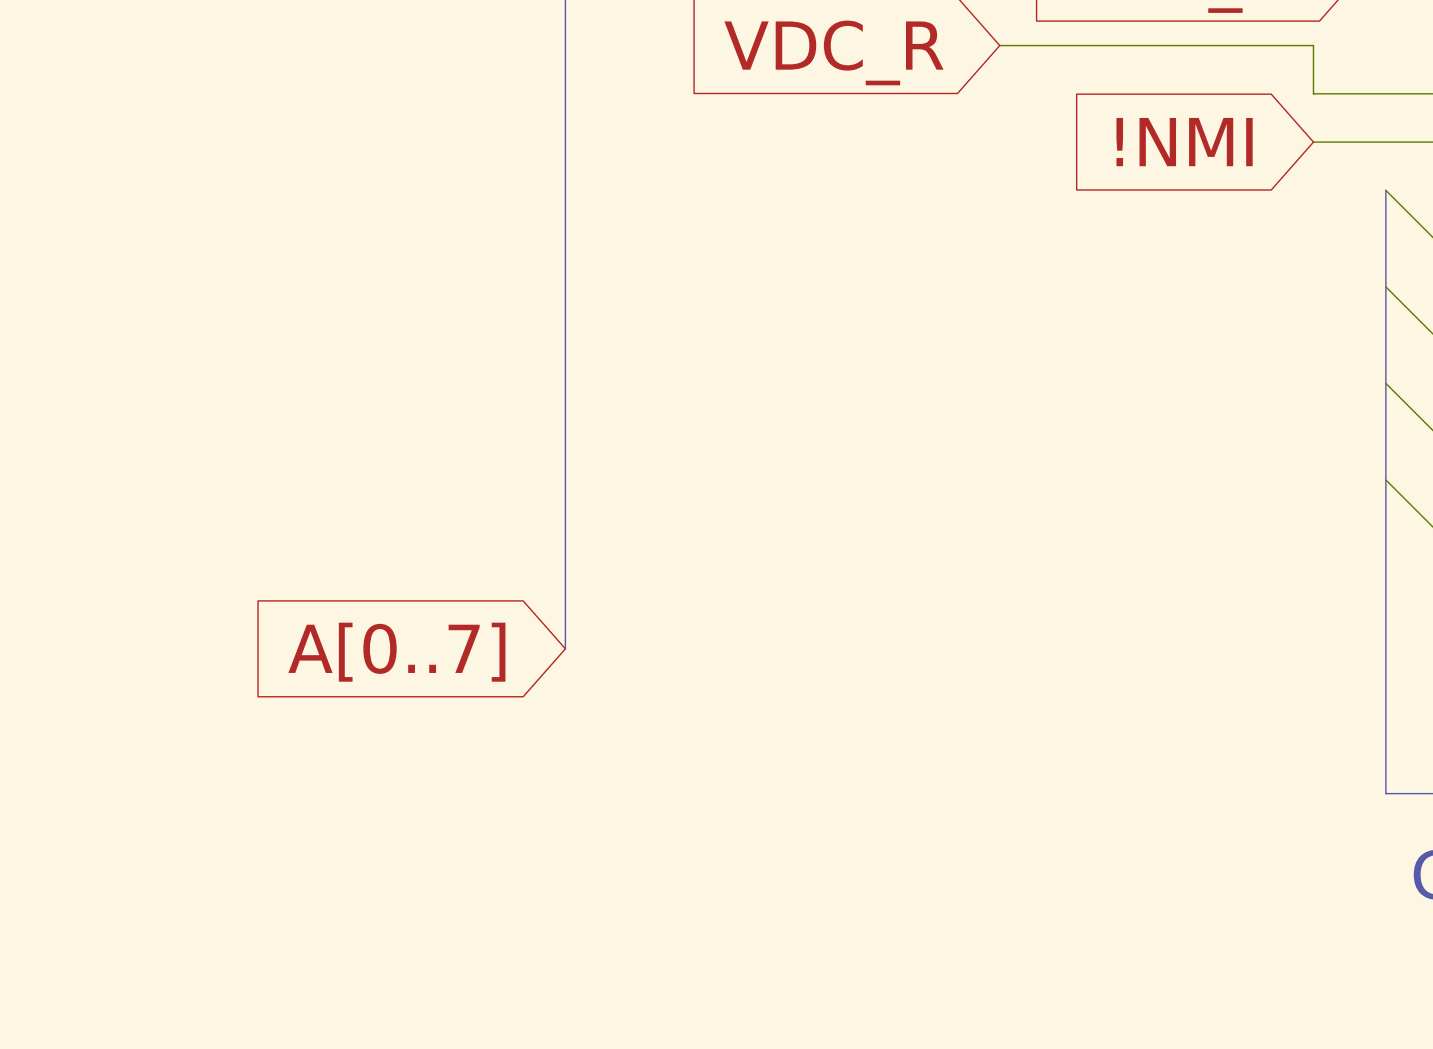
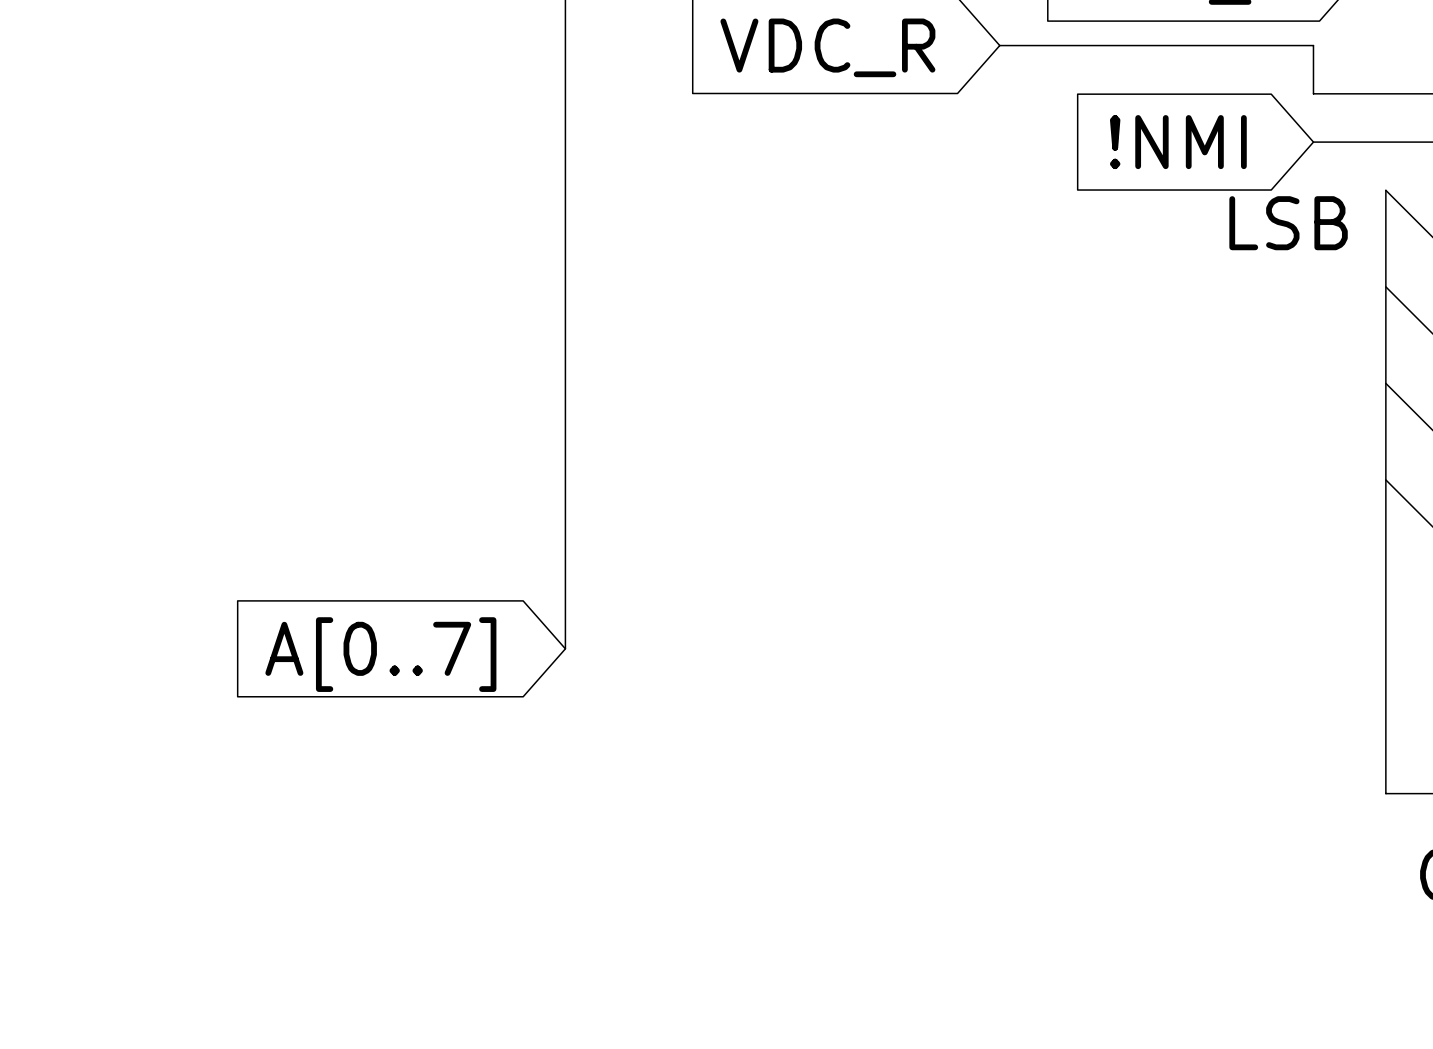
text: none -> LSB (1288, 223)

